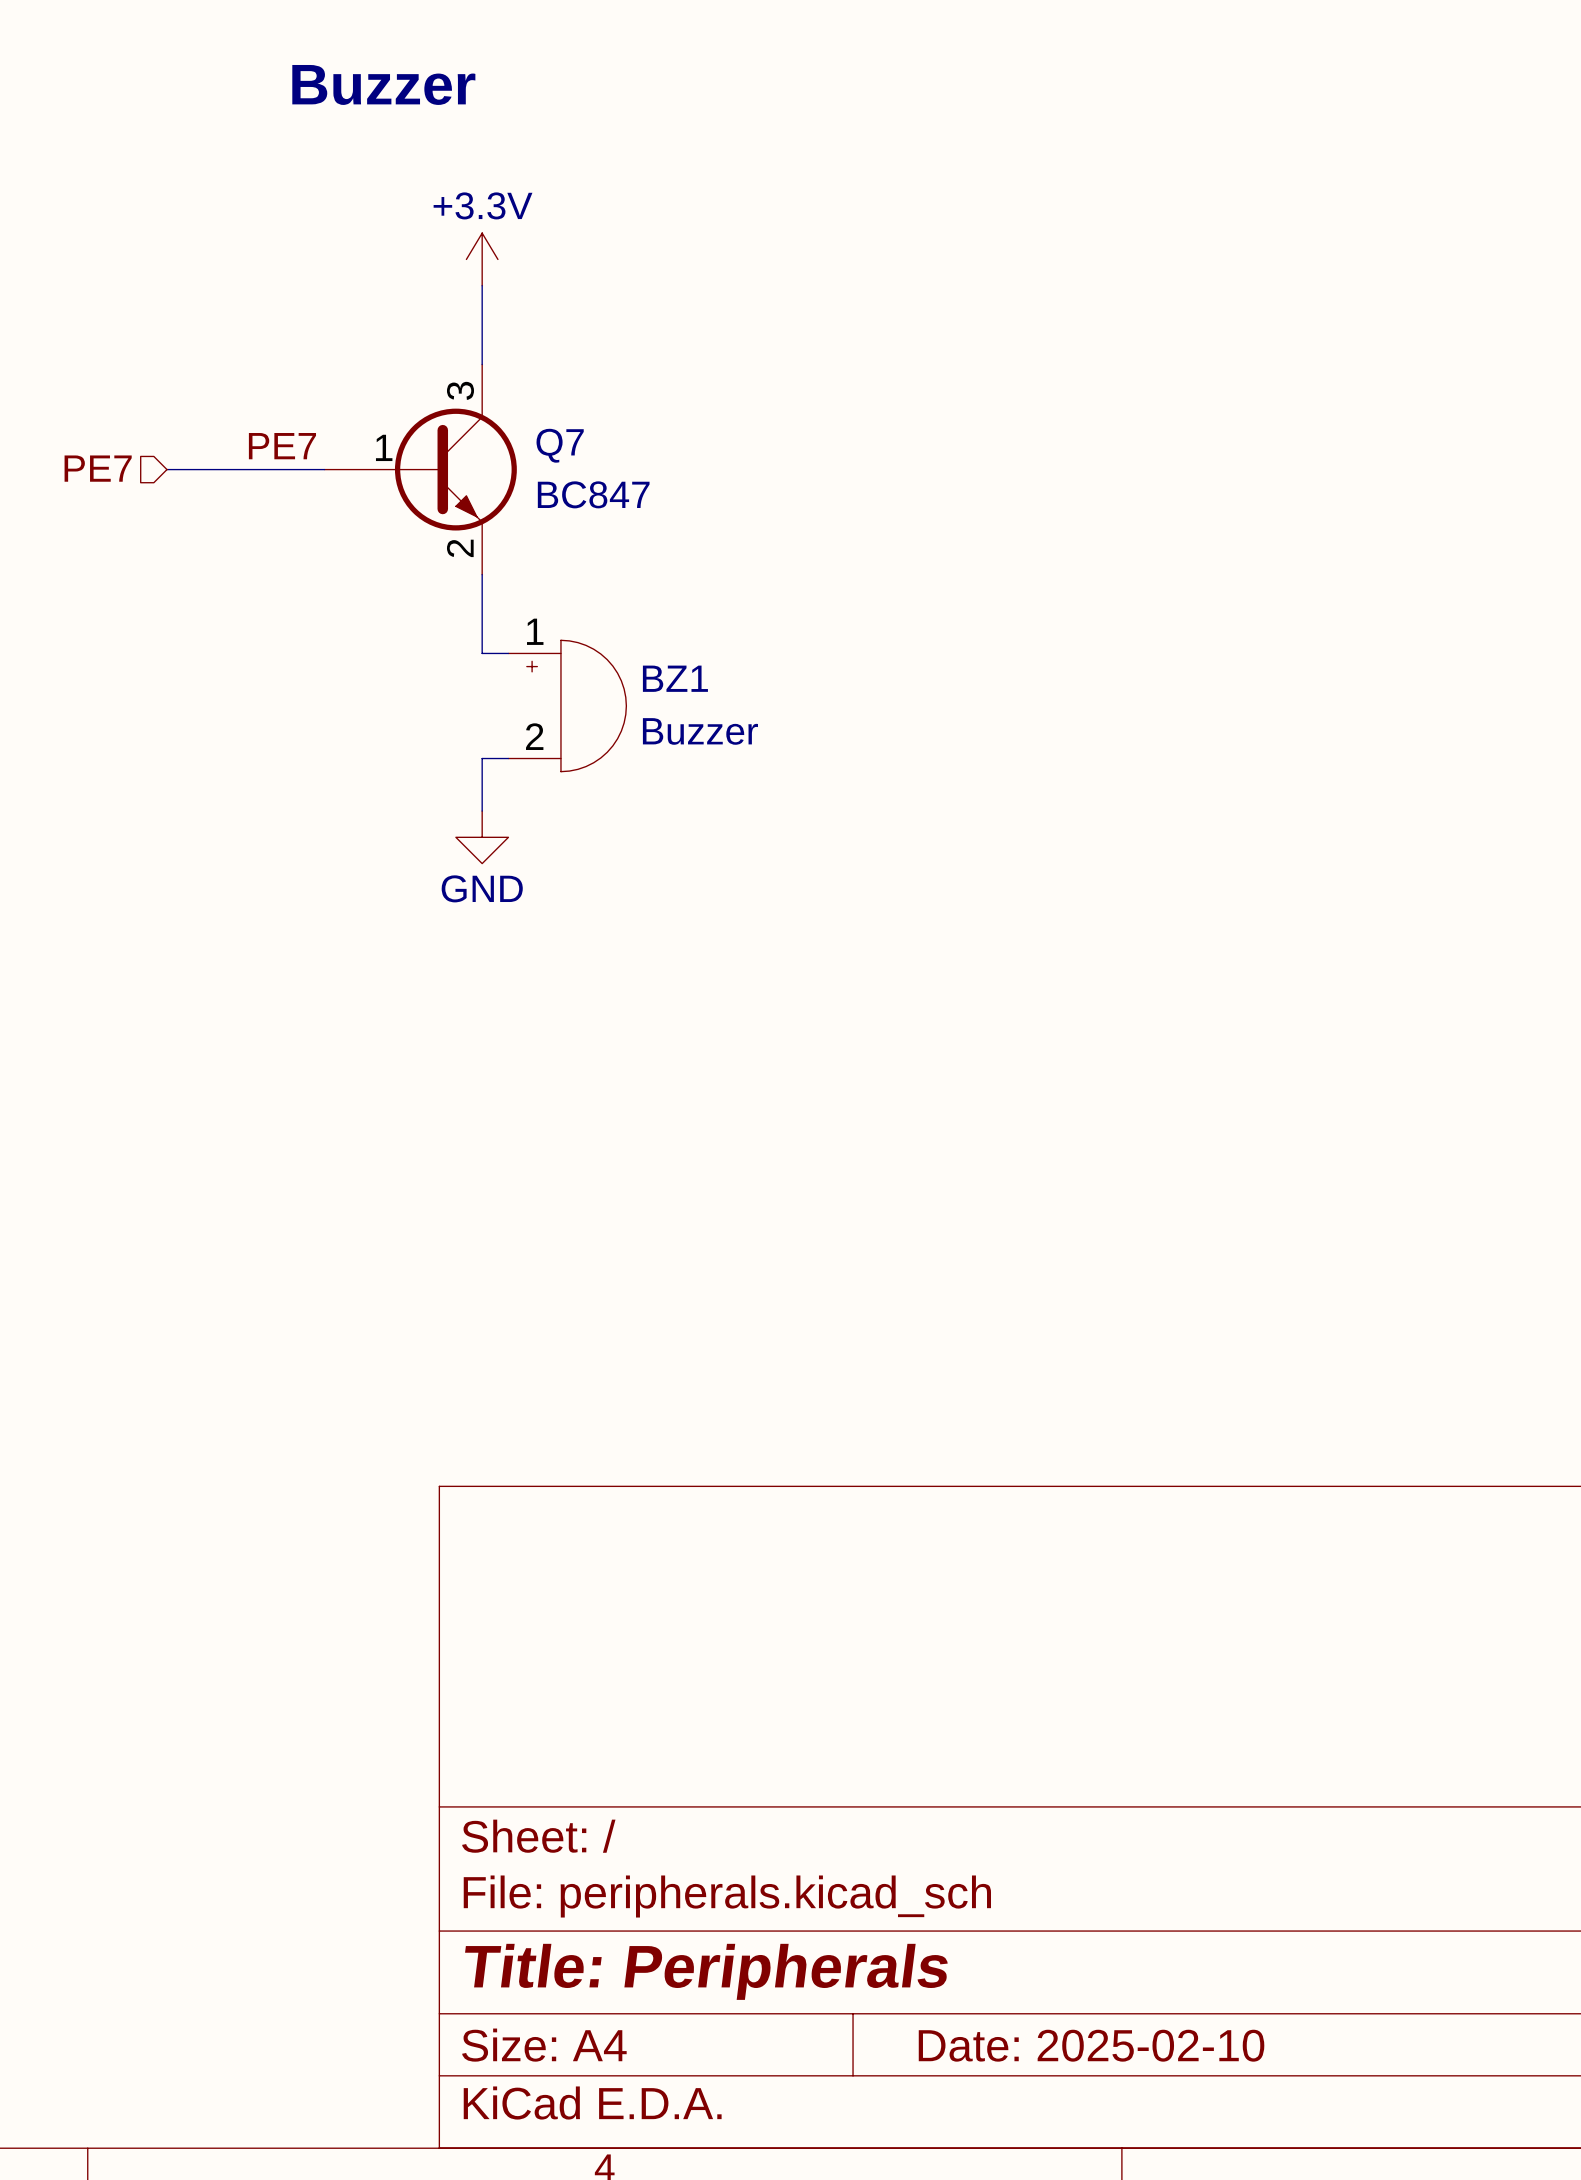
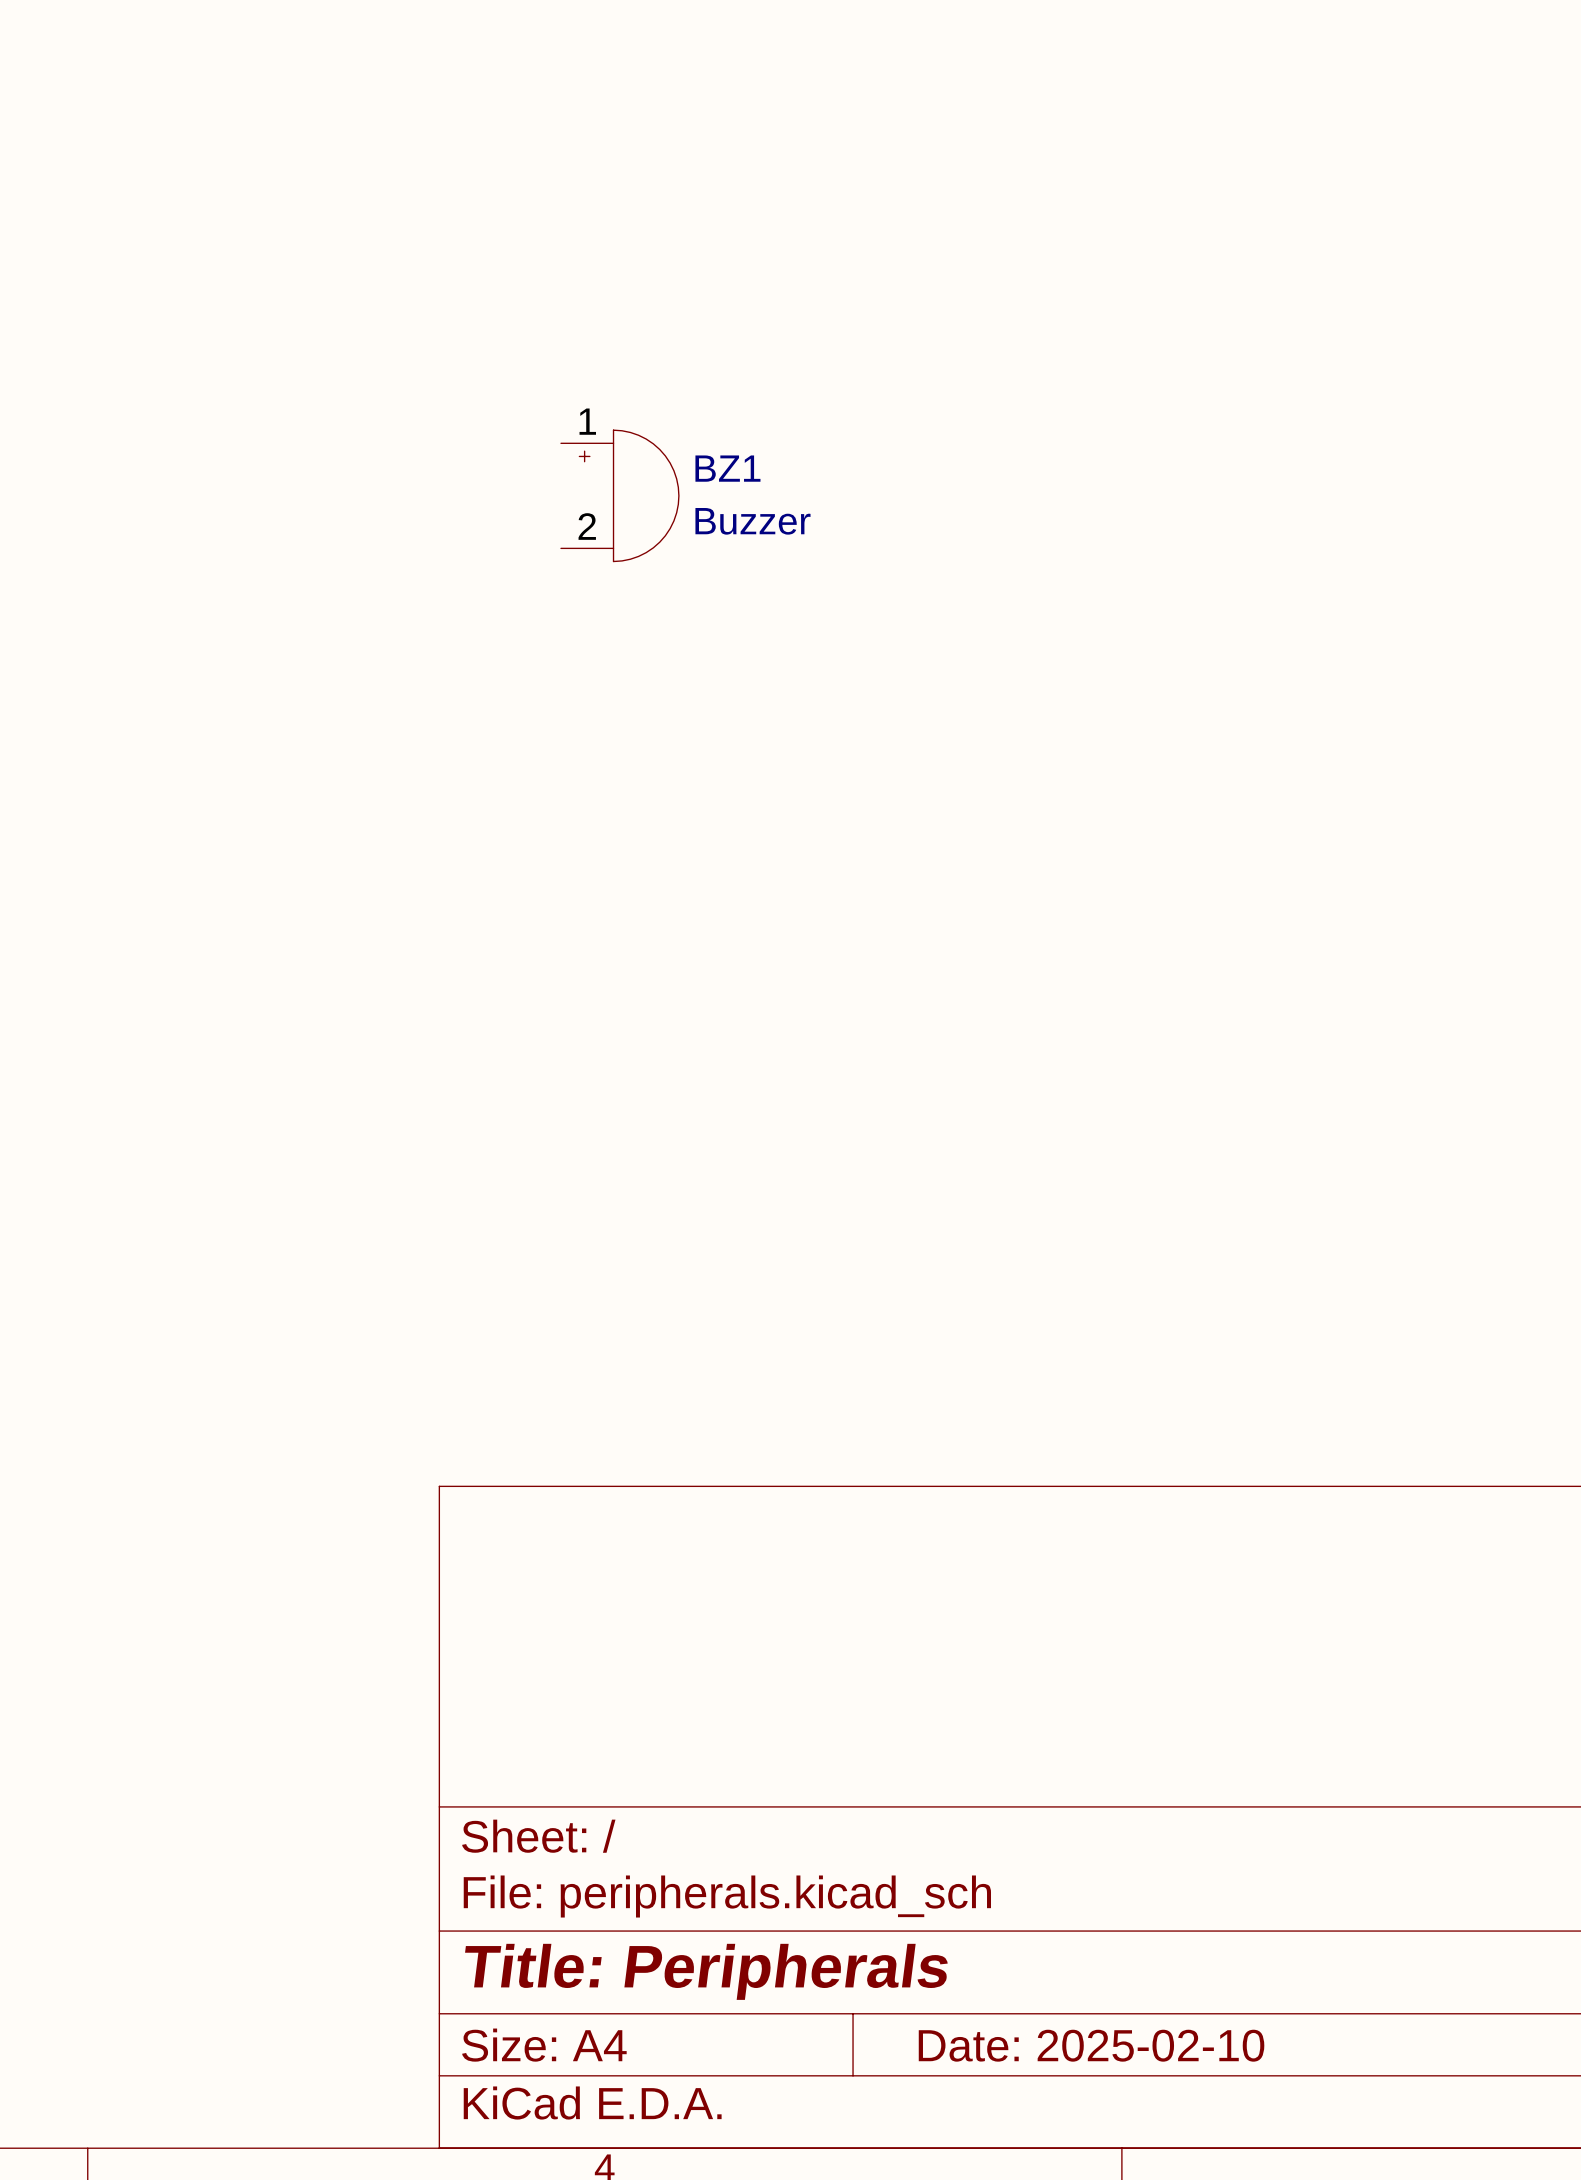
text: Buzzer (383, 84) -> none
power symbol: +3.3V (482, 259) -> none
wire: (482, 285) (482, 364) -> none
label: PE7 (282, 446) -> none
hierarchical label: PE7 (98, 468) -> none
wire: (166, 469) (324, 469) -> none
Q7: BC847 (420, 469) -> none
wire: (482, 574) (482, 653) (508, 653) -> none
BZ1 position: (567, 705) -> (619, 495)
wire: (508, 758) (482, 758) (482, 811) -> none
power symbol: GND (482, 837) -> none

